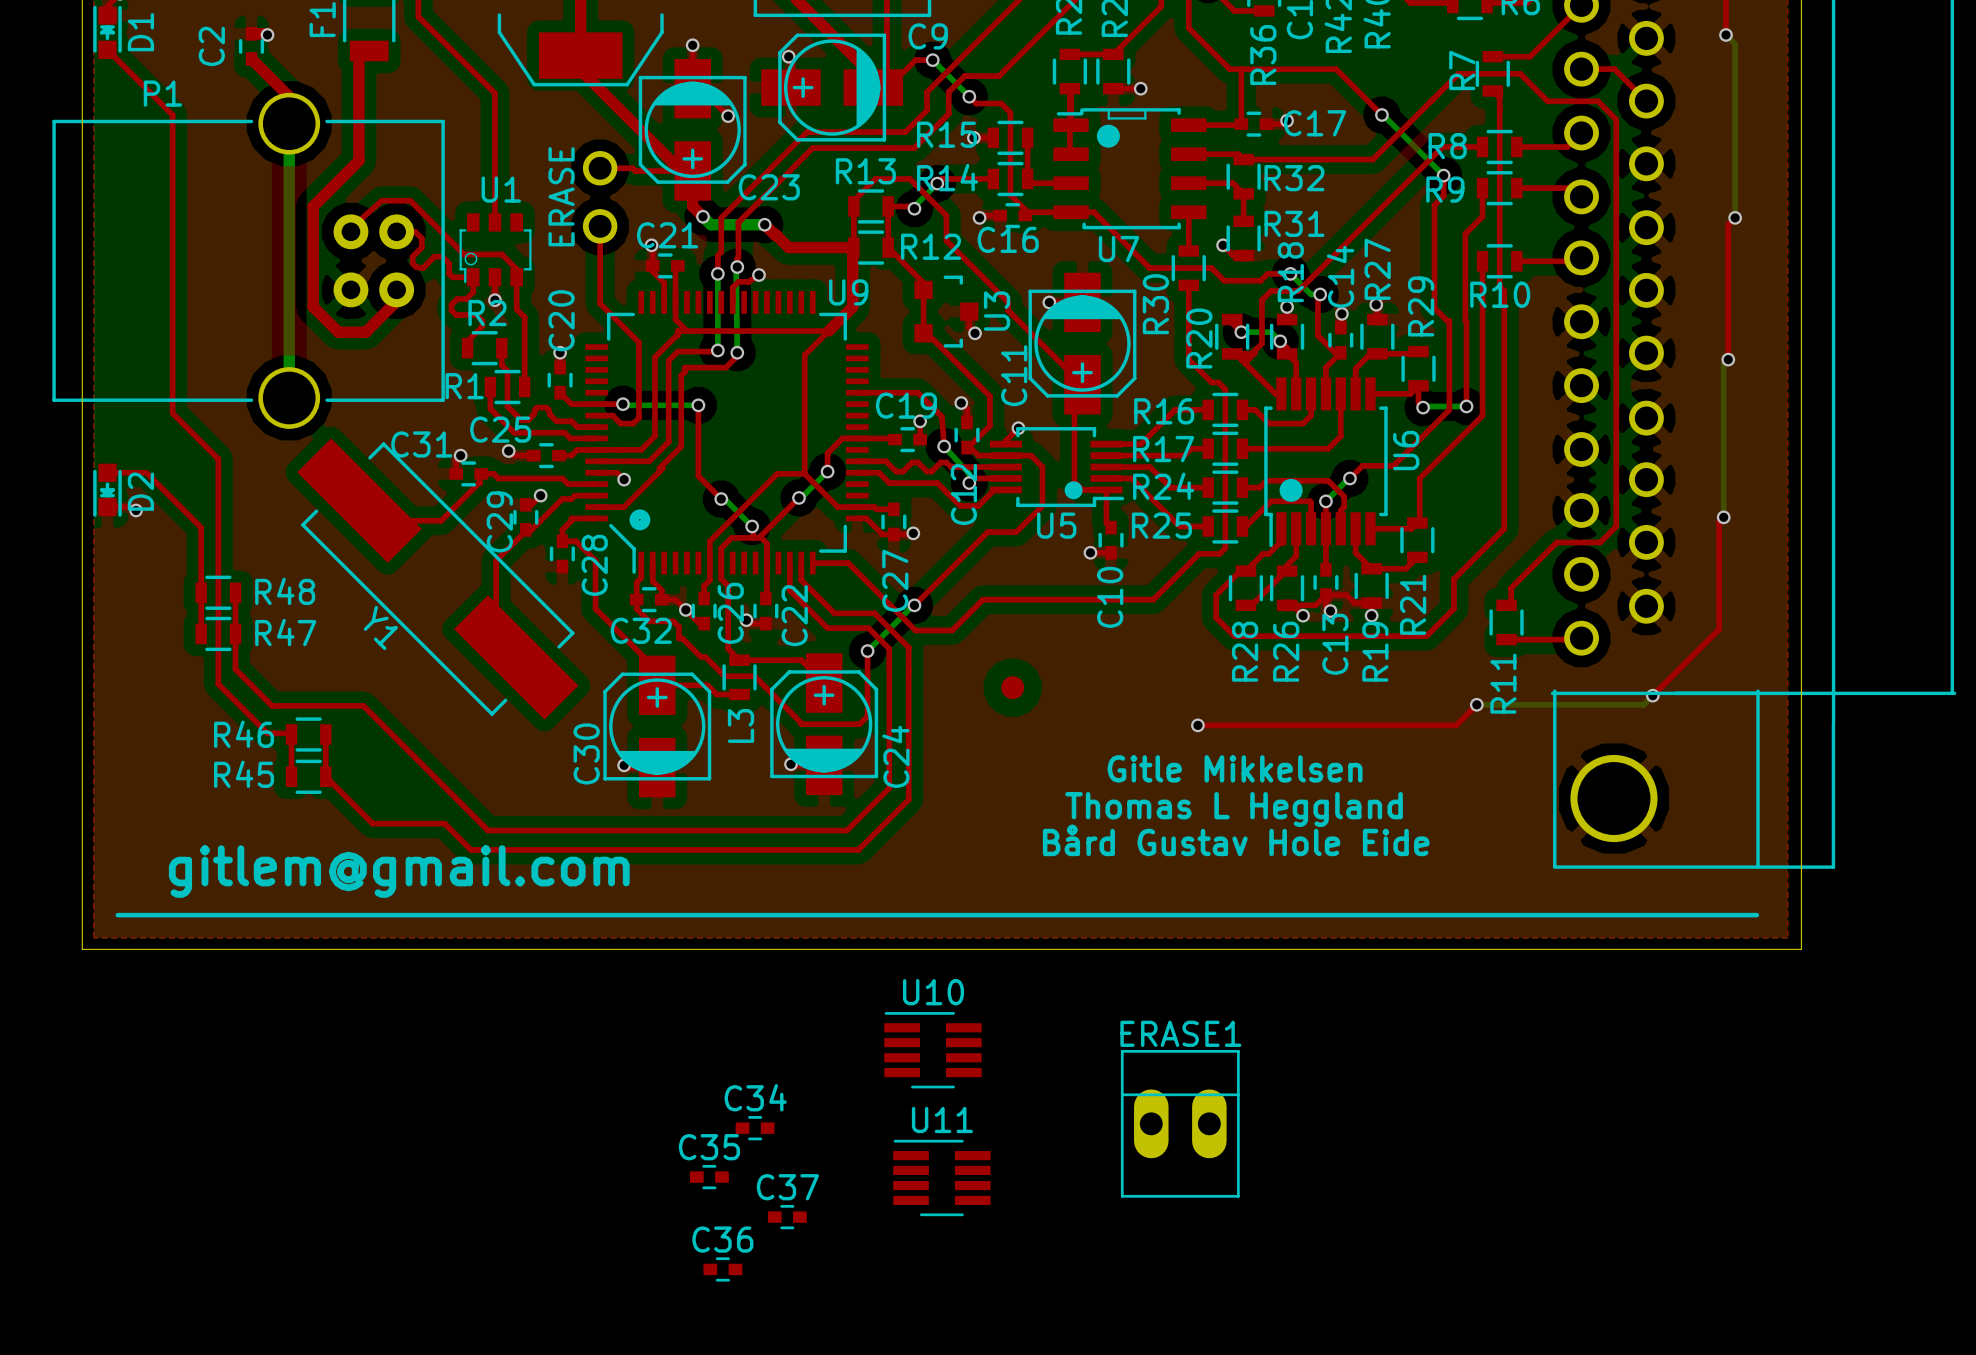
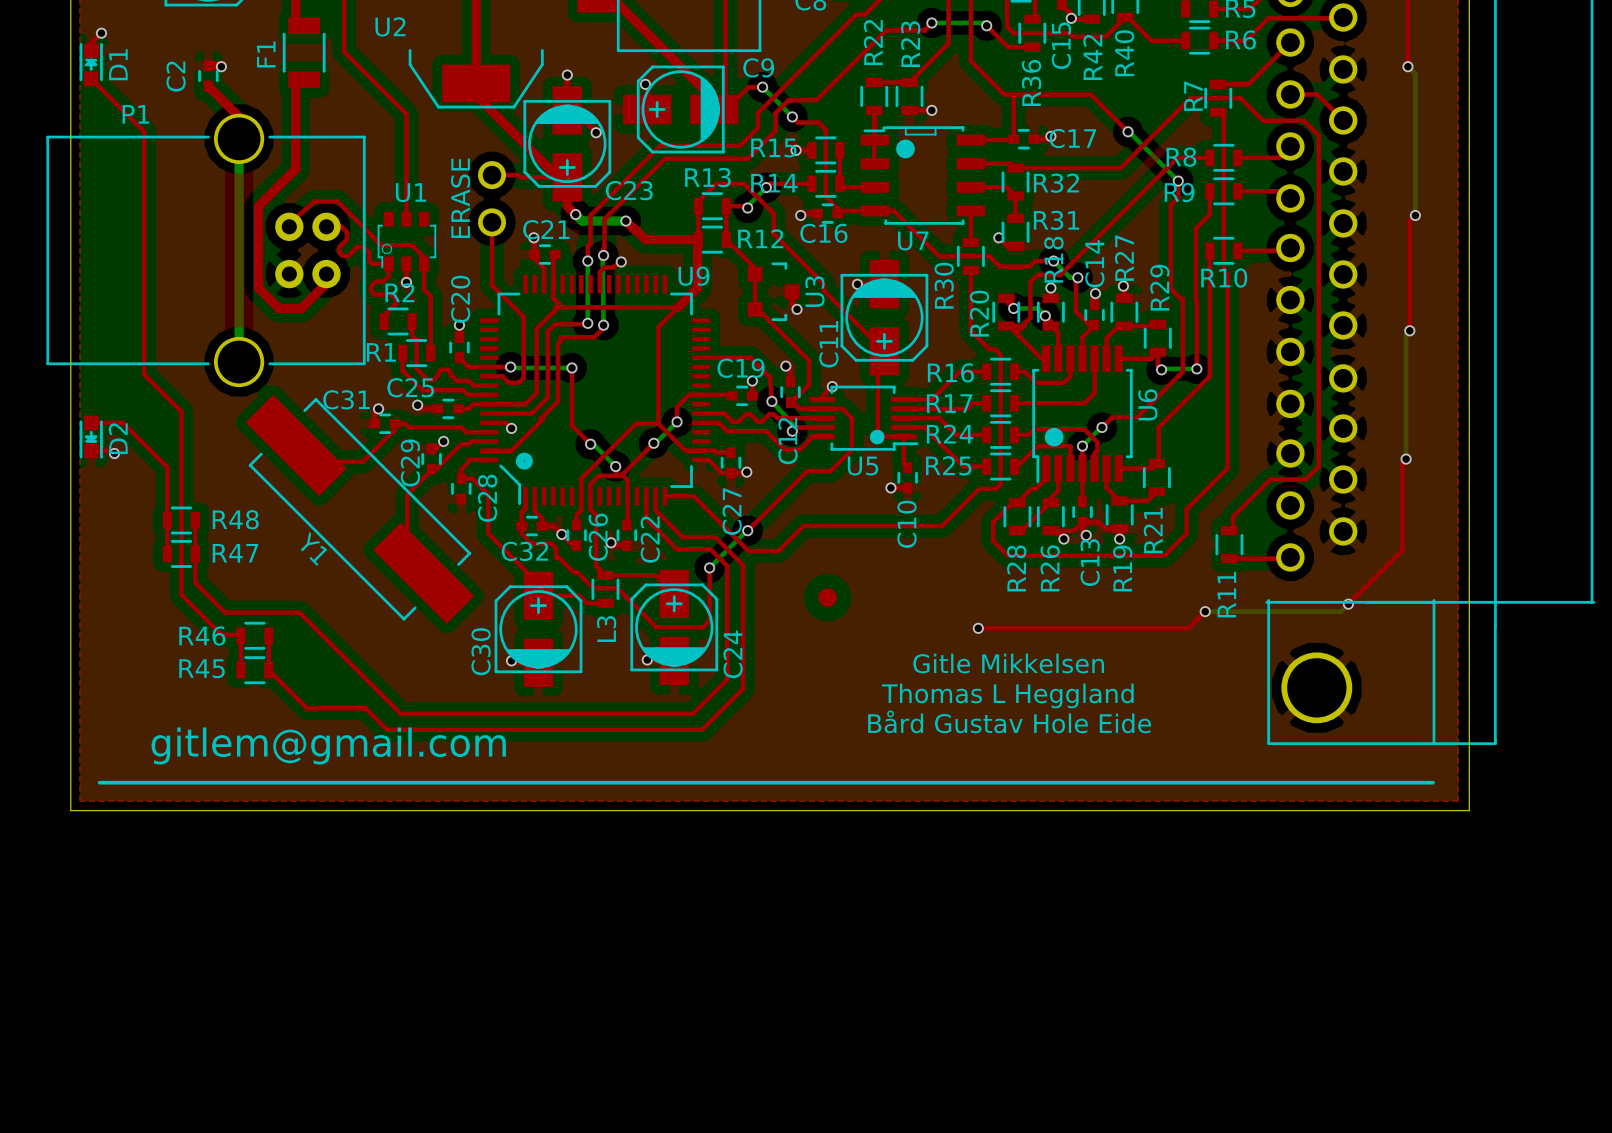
U10: (932, 1050) -> none
ERASE1: (1180, 1123) -> none
C34: (755, 1128) -> none
C35: (709, 1177) -> none
U11: (941, 1178) -> none
C37: (787, 1217) -> none
C36: (722, 1269) -> none

